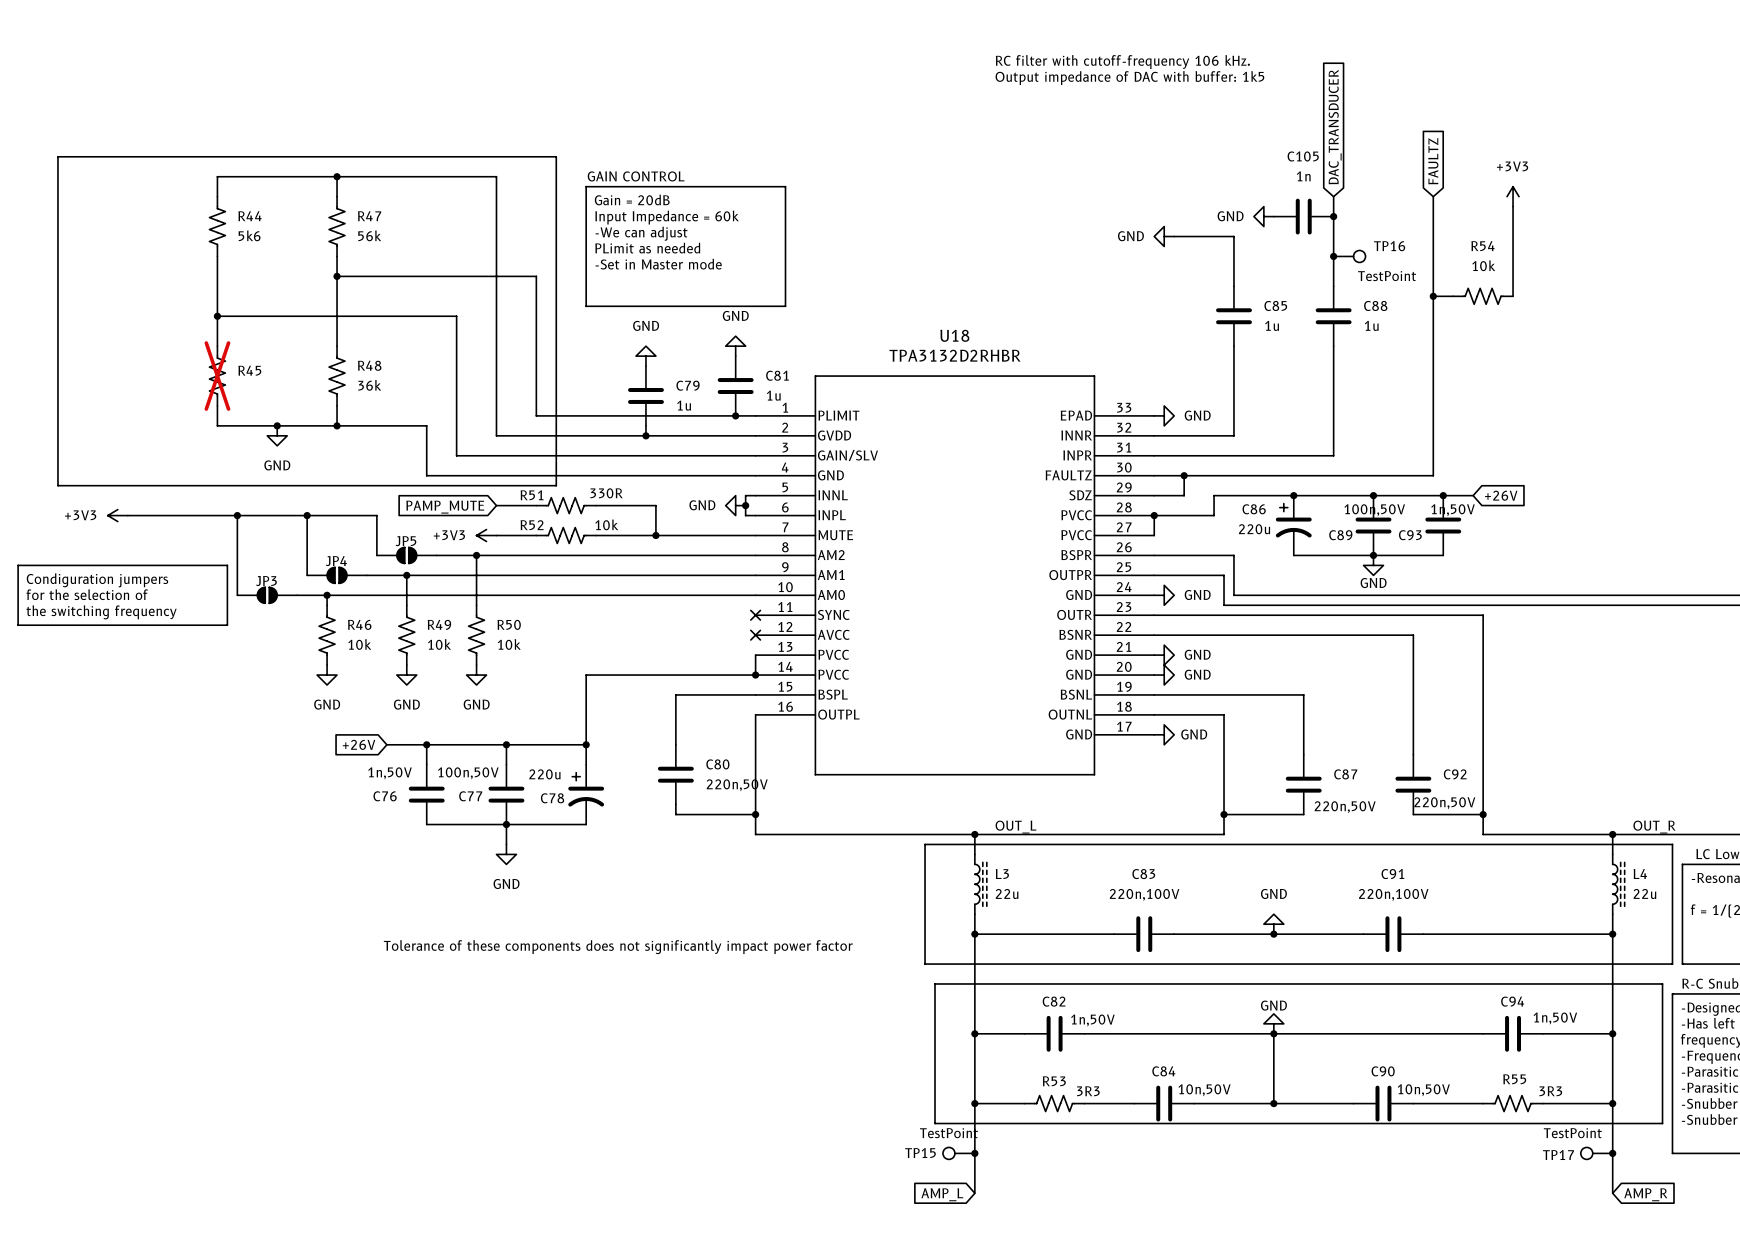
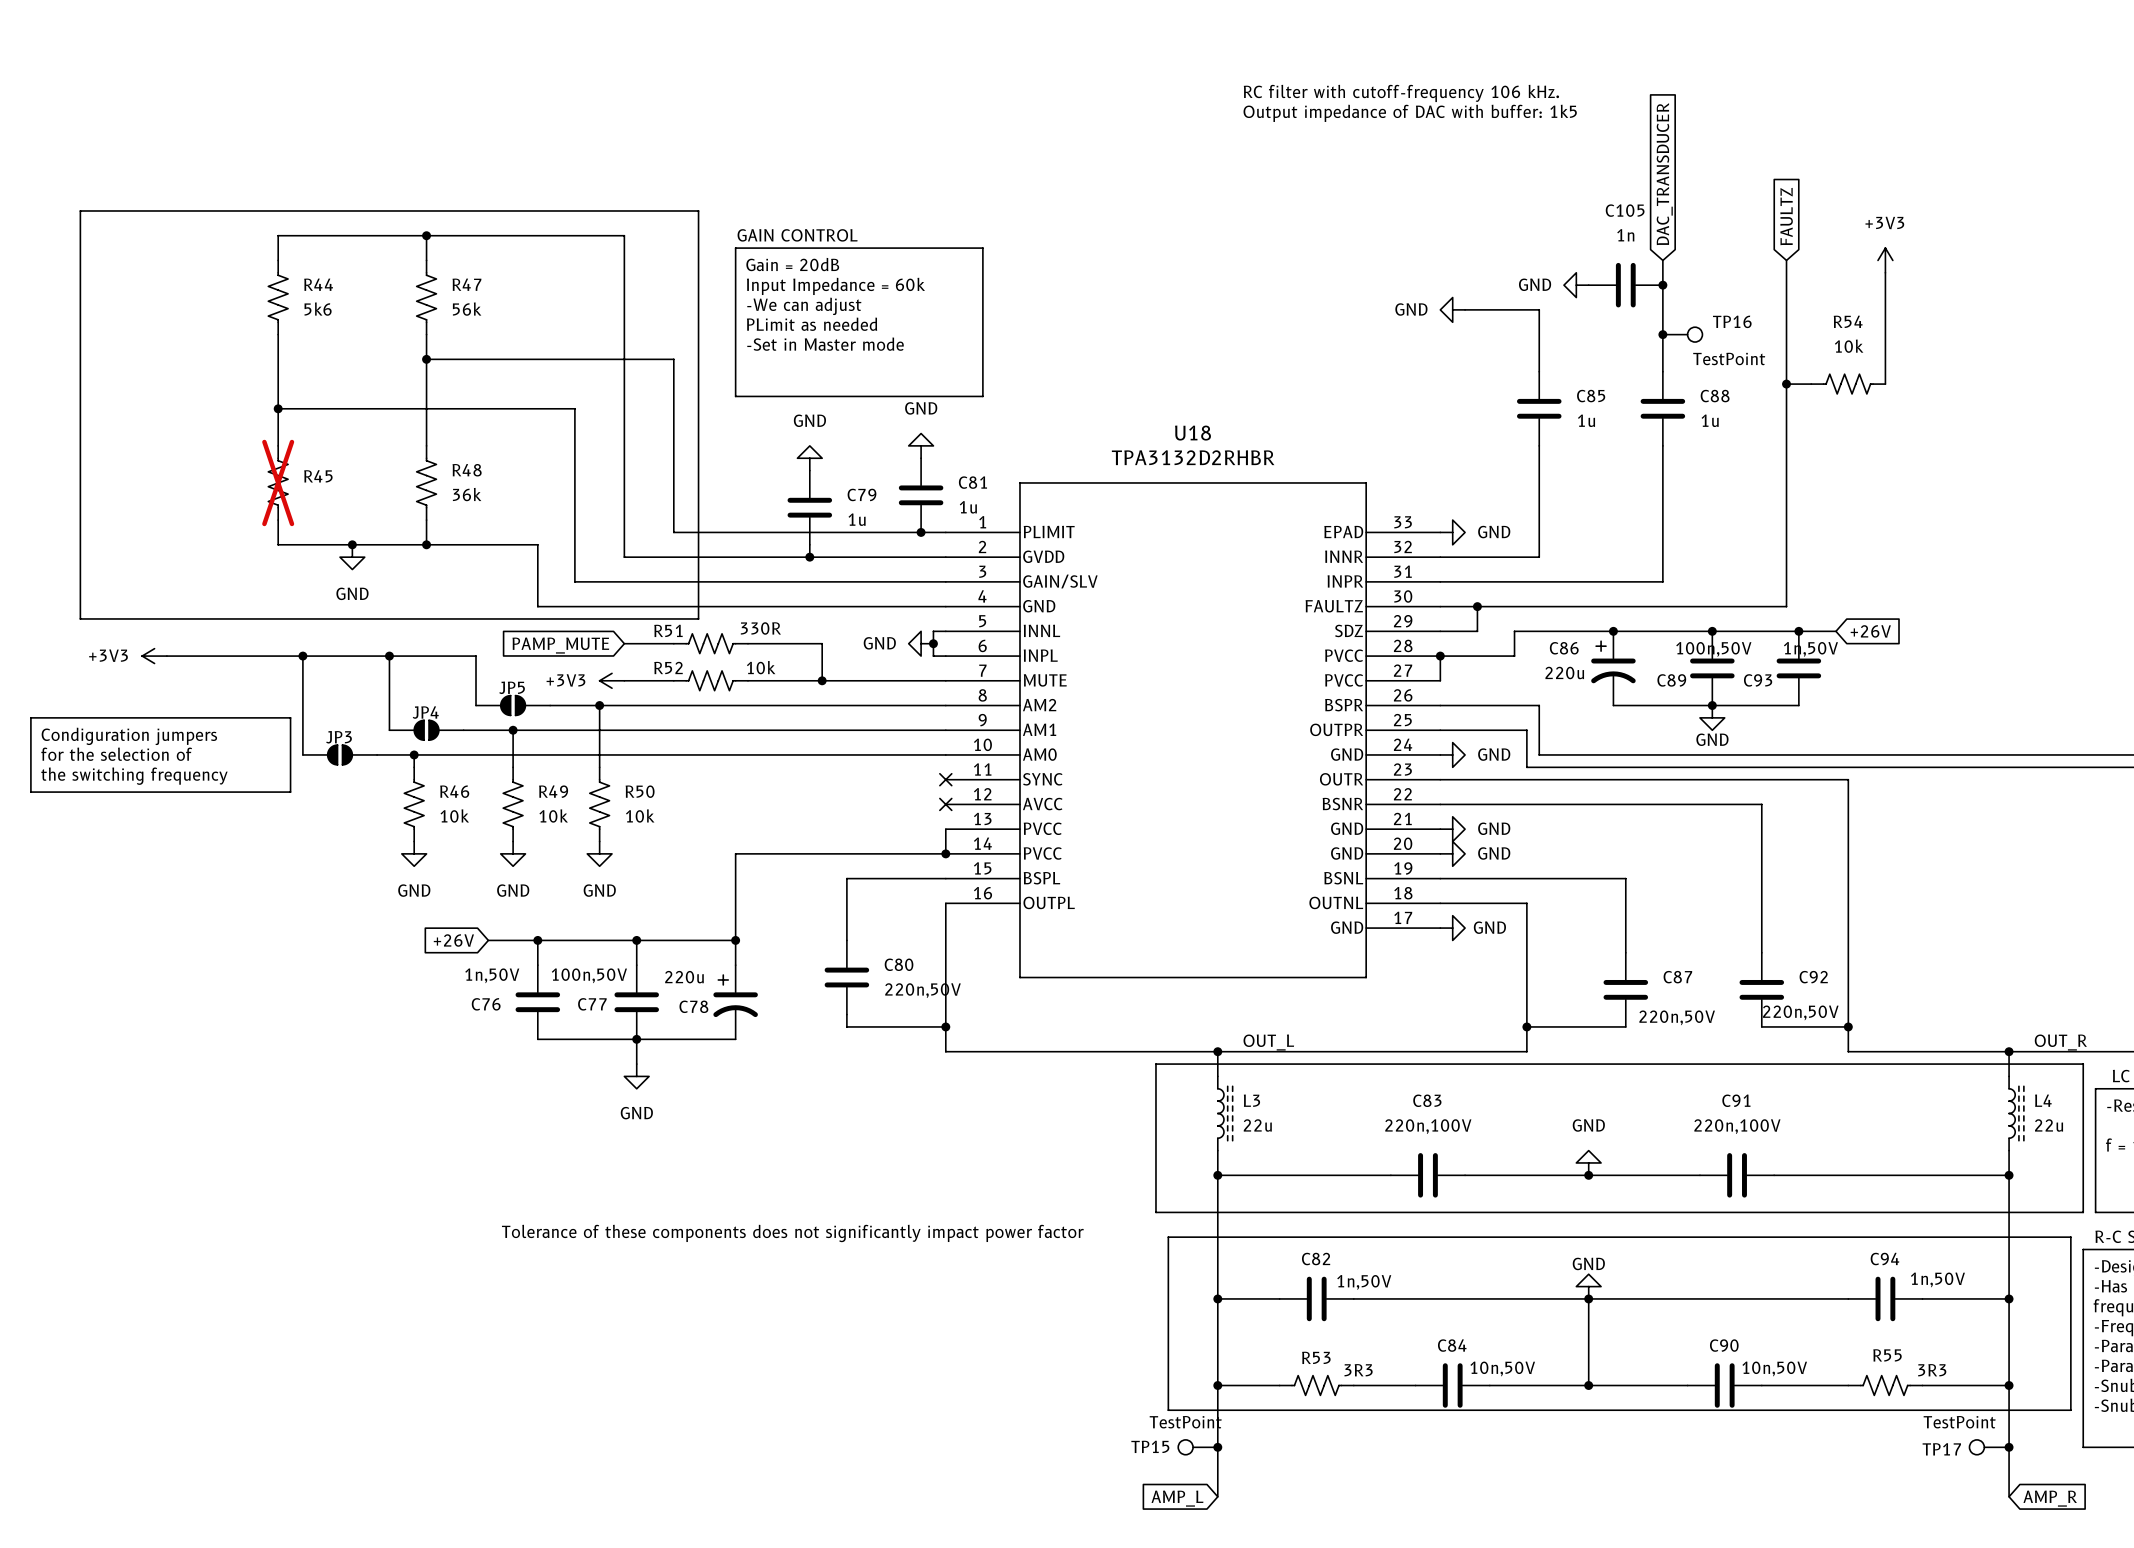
text position: Tolerance of these components does not significantly impact power factor (618, 947) -> Tolerance of these components does not significantly impact power factor (792, 1233)

